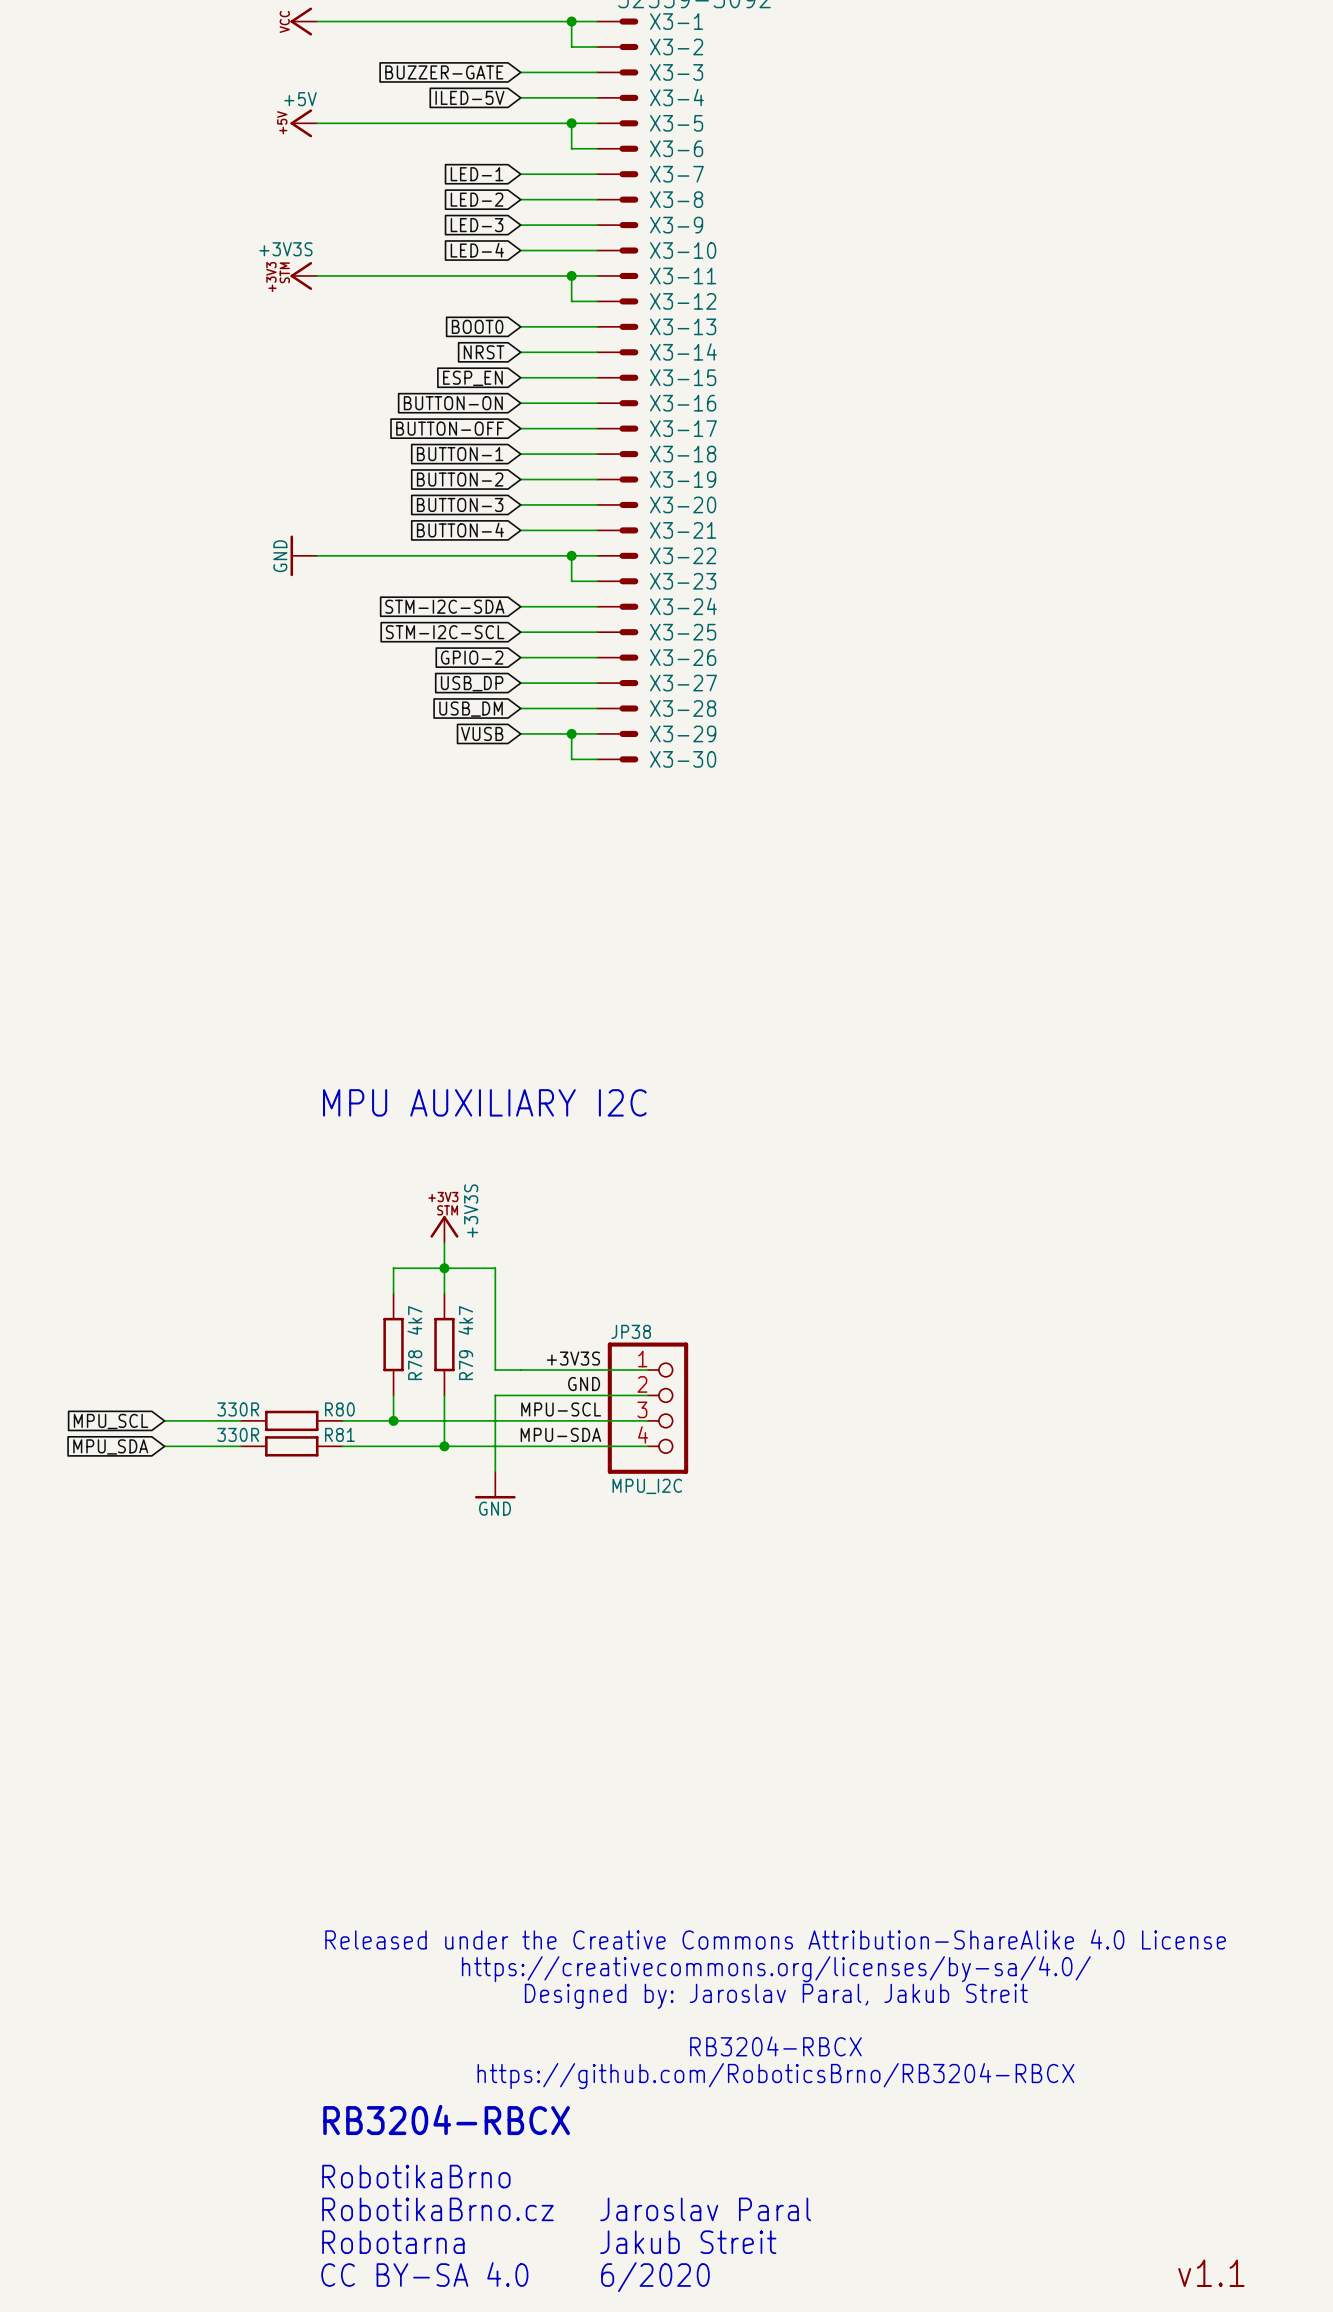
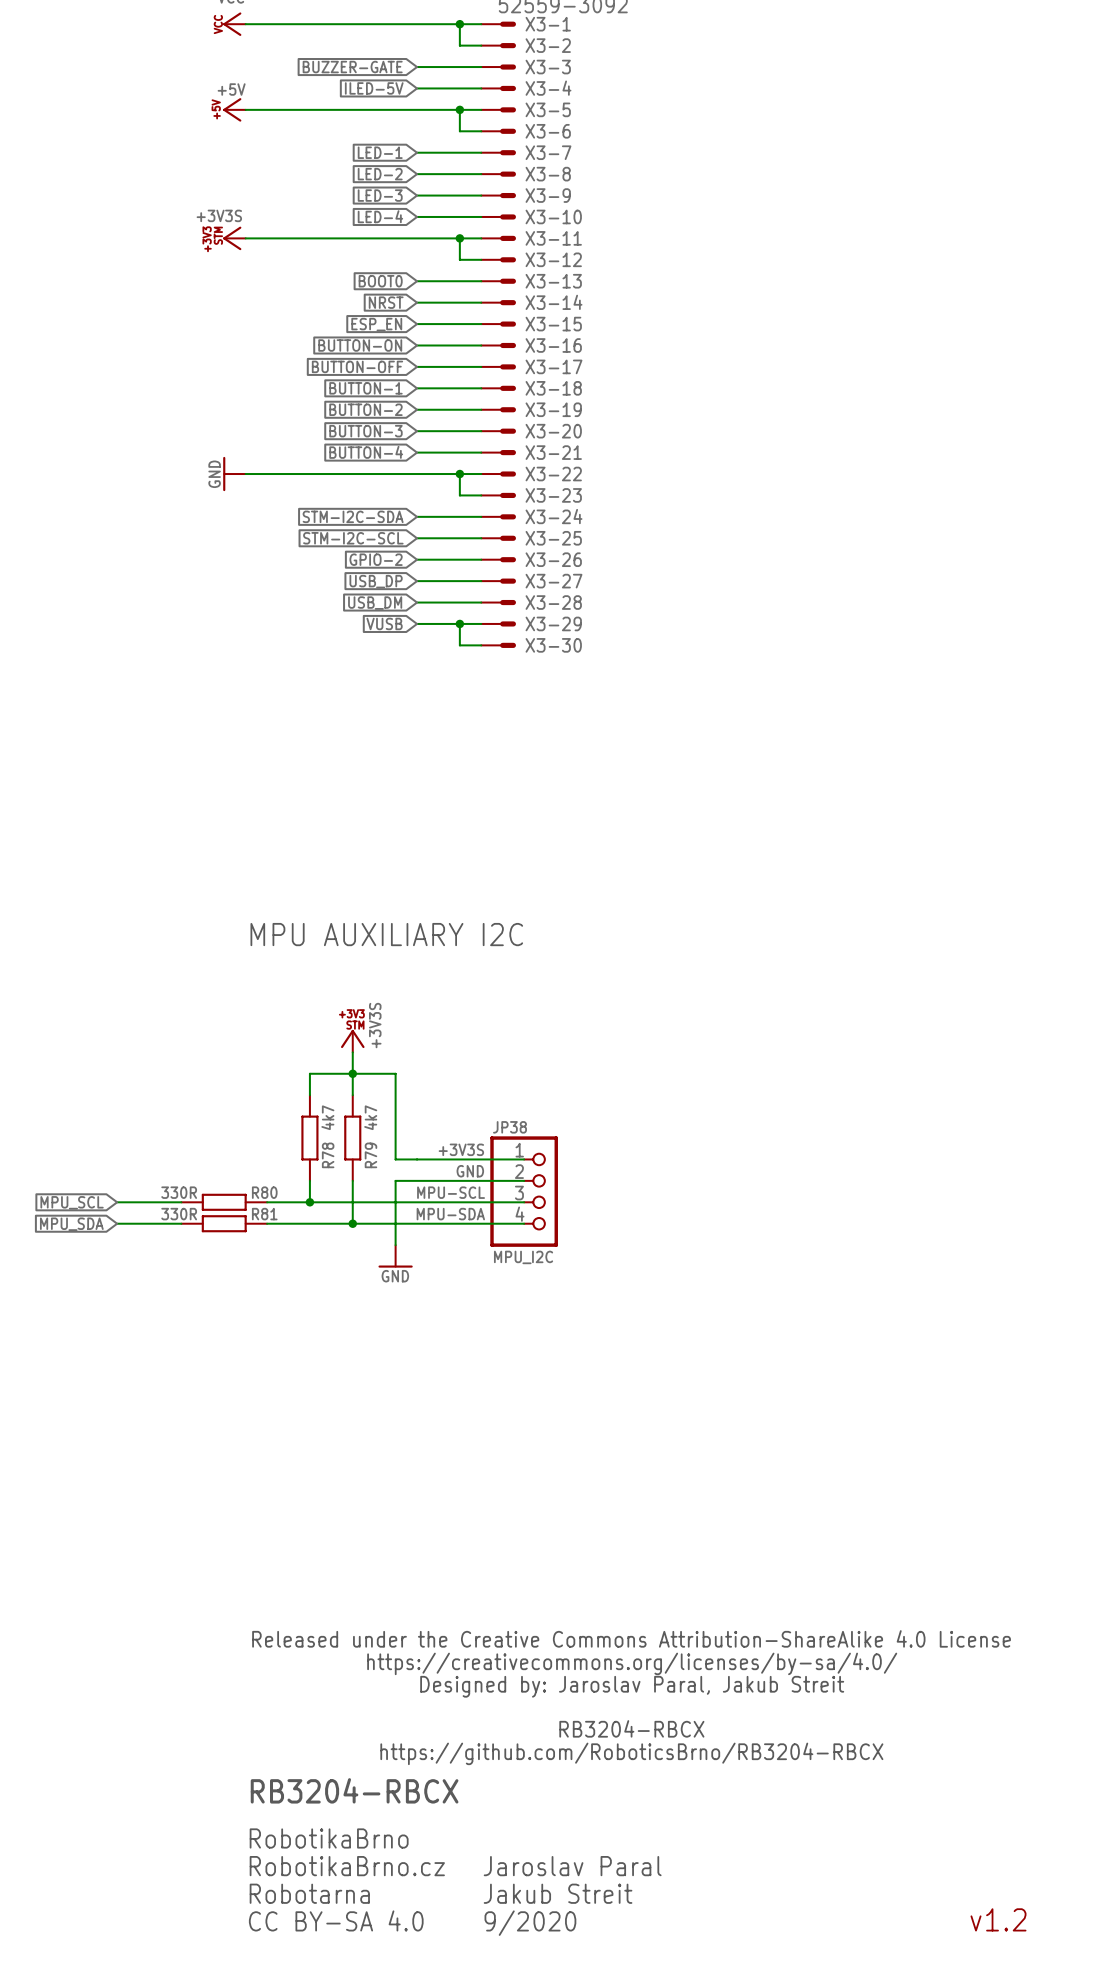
text: v1.1 (1211, 2273) -> v1.2 (998, 1919)
text: 6/2020 (655, 2277) -> 9/2020 (530, 1923)

